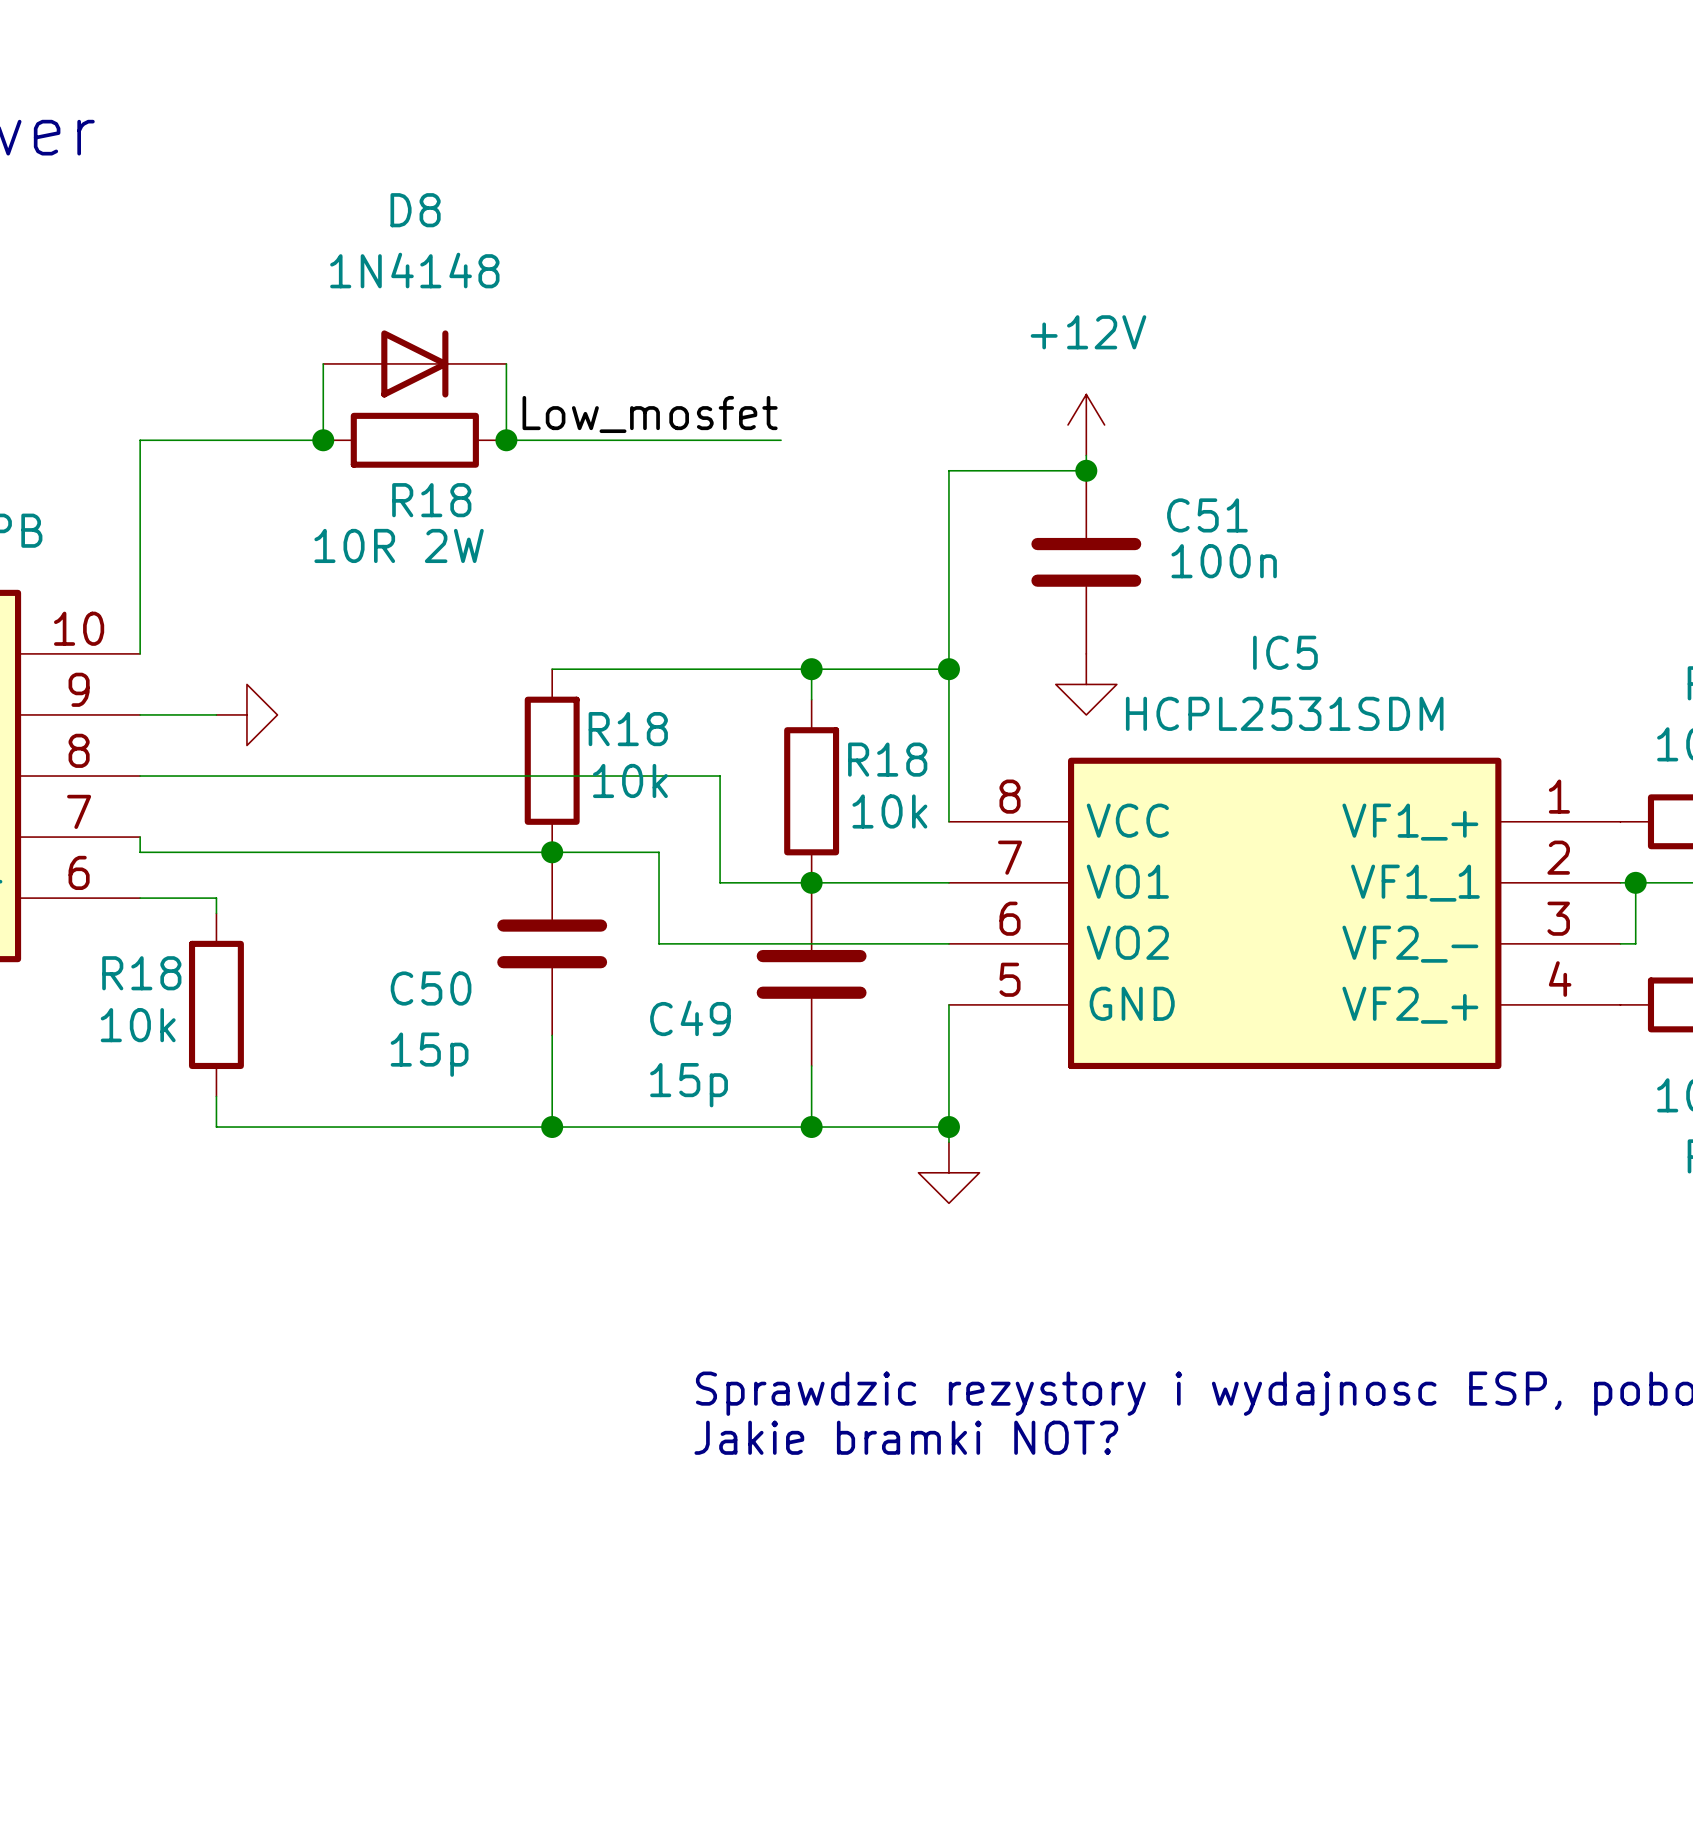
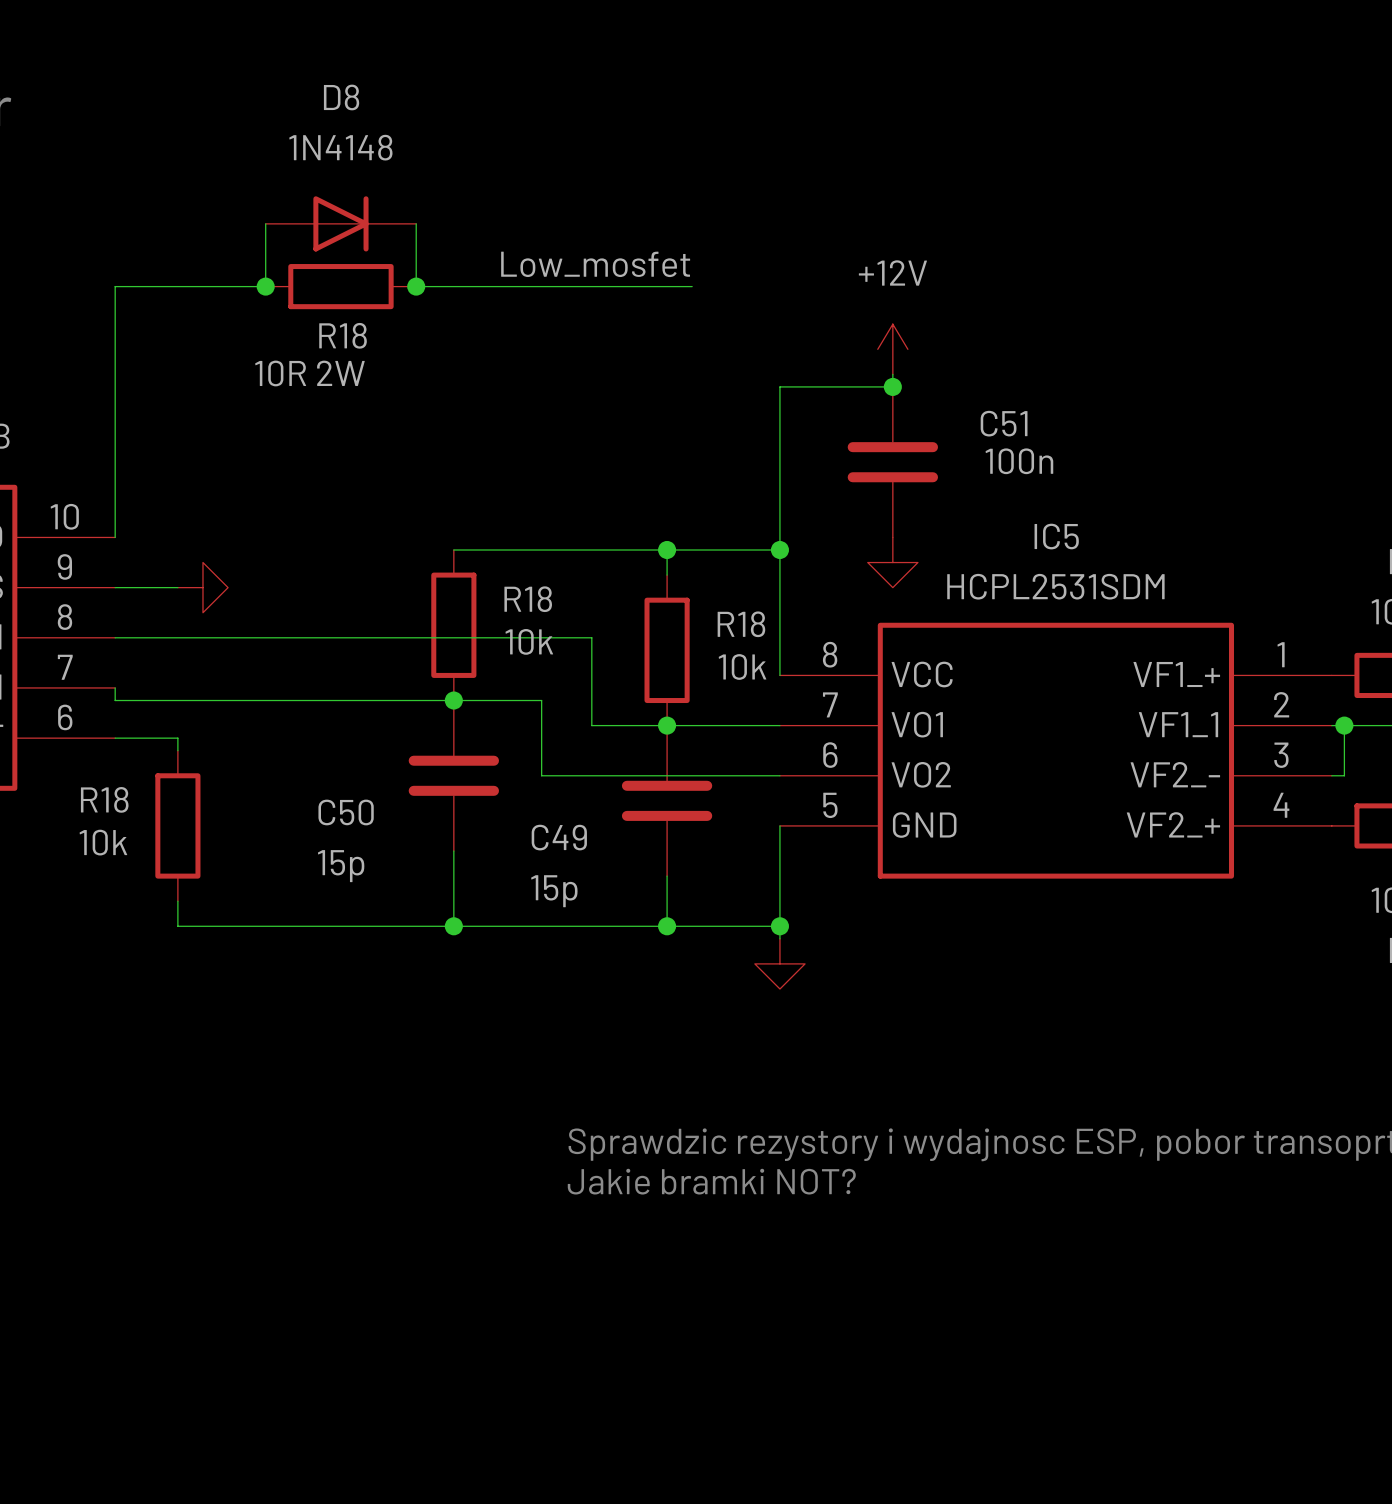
wire: none -> (416, 223) (416, 286) (692, 286)
wire: (323, 363) (323, 440) (140, 440) -> (265, 223) (265, 286) (115, 286) (115, 361)
D8 position: (414, 363) -> (340, 223)
wire: (506, 363) (506, 440) (781, 440) -> none
label position: Low_mosfet (650, 414) -> Low_mosfet (595, 264)
junction position: (323, 440) -> (265, 286)
R18 position: (414, 440) -> (340, 286)
junction position: (506, 440) -> (416, 286)

